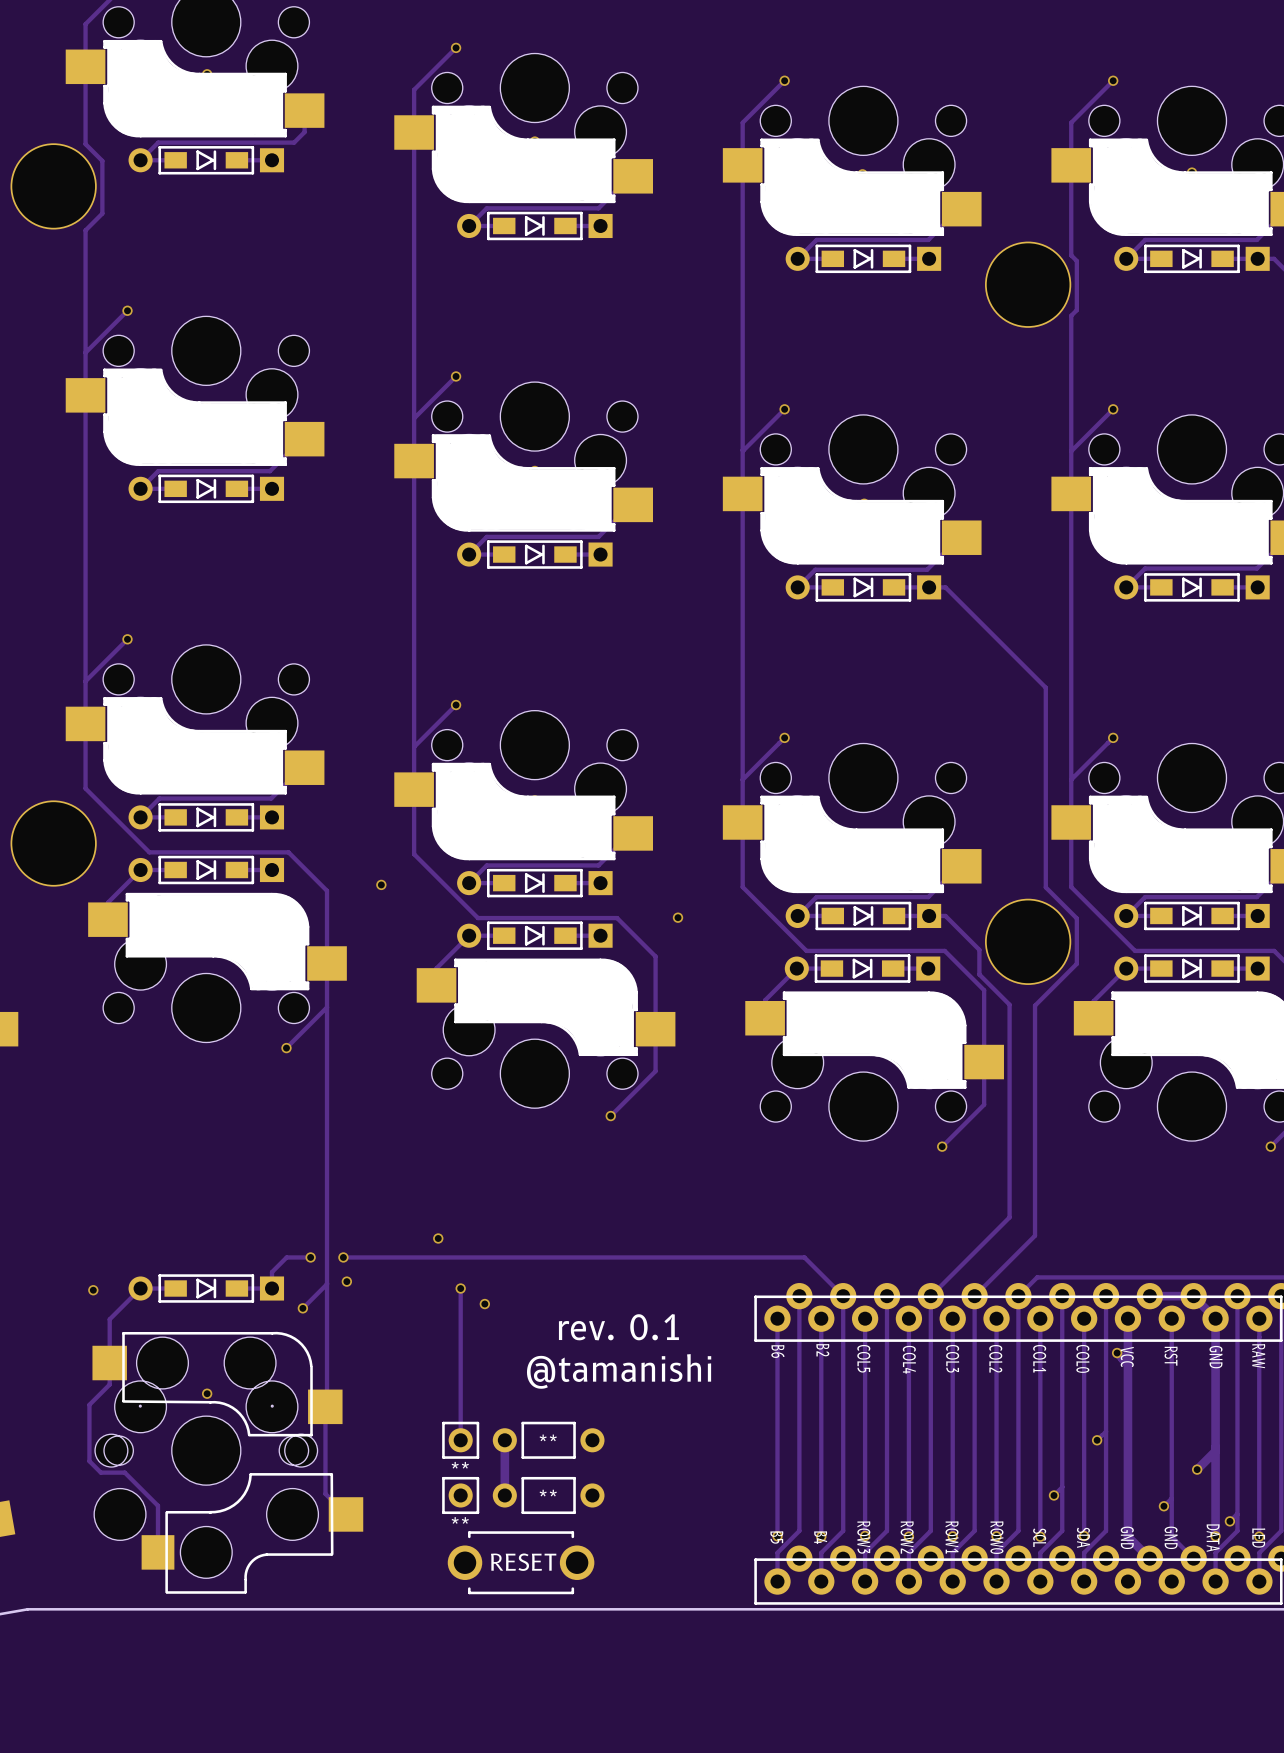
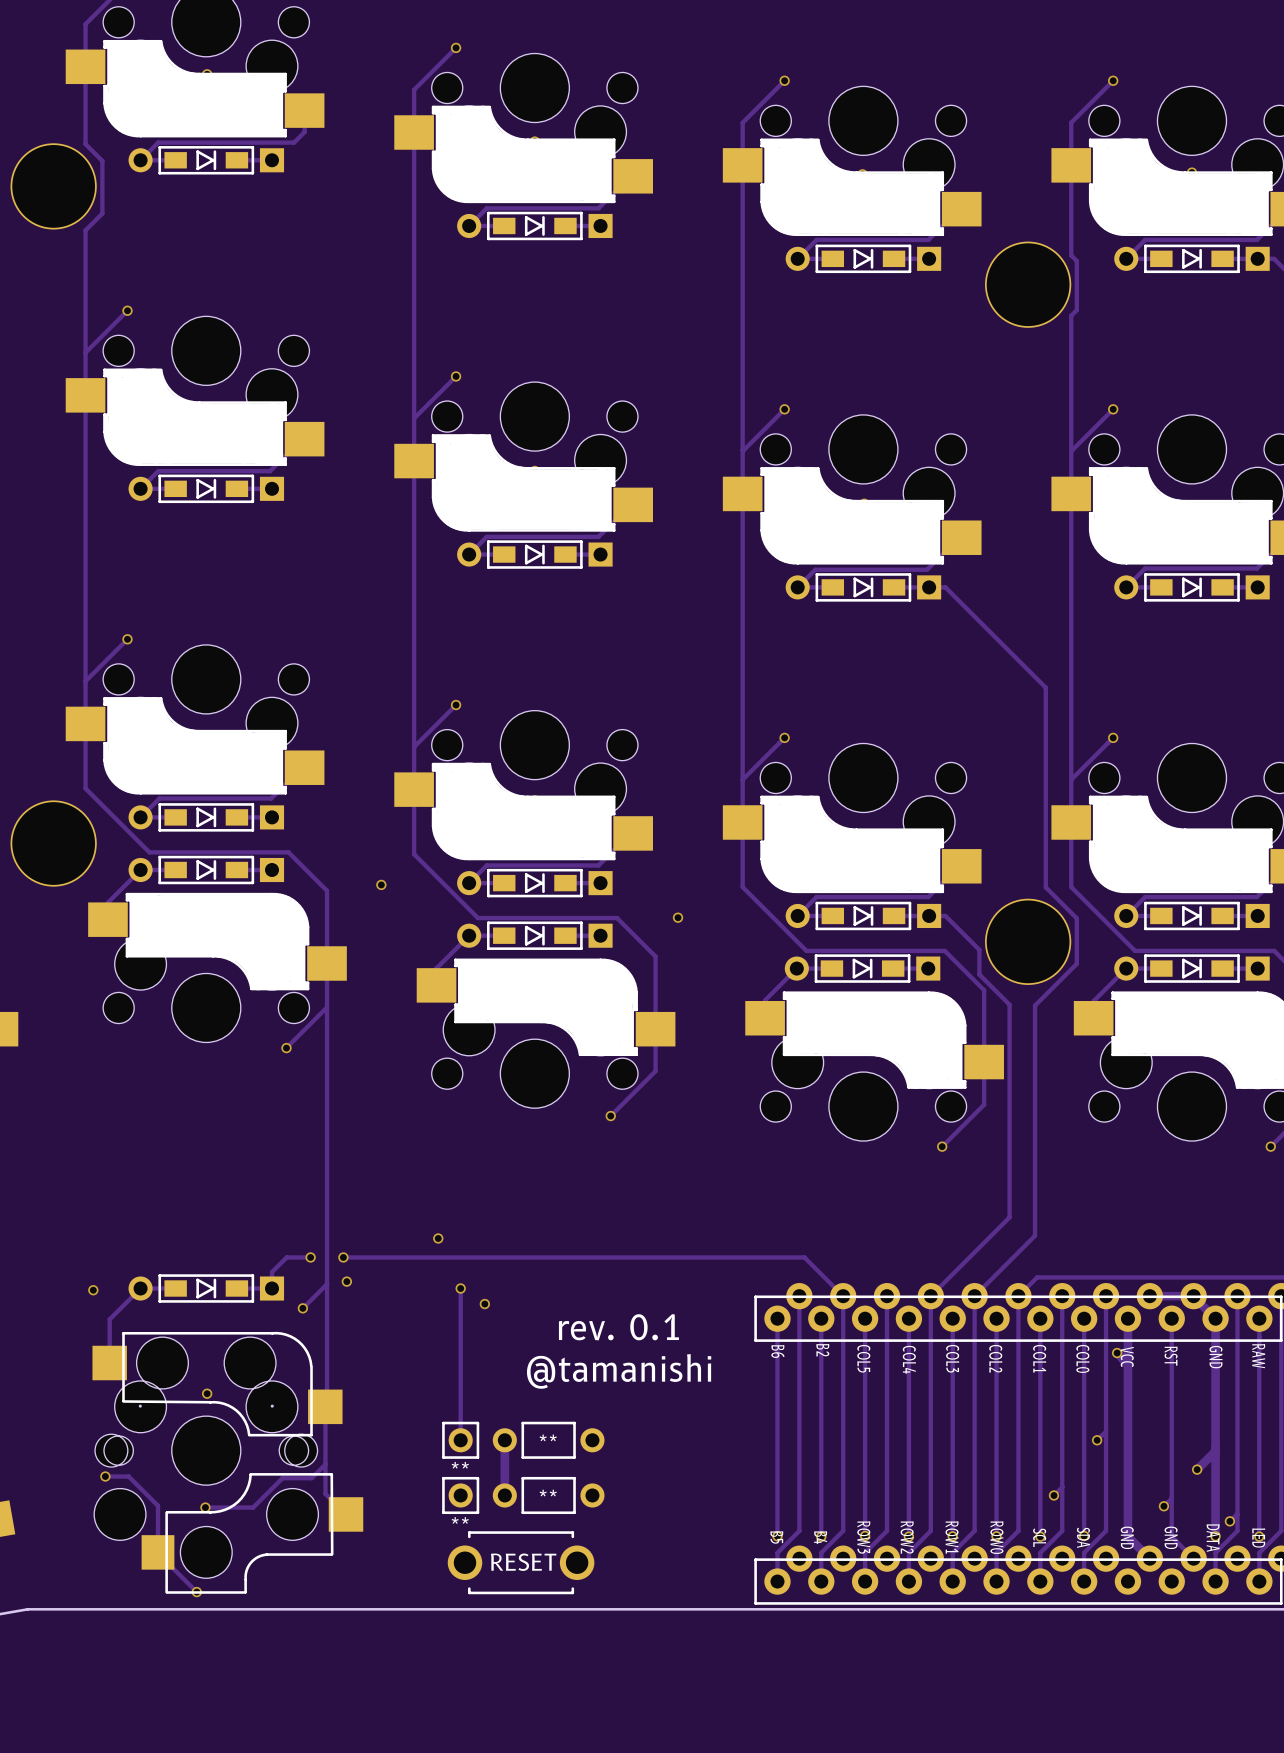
track: (109, 1363) (109, 1384) (89, 1404) (89, 1461) (100, 1472) (124, 1472) (128, 1476) -> (105, 1476) (128, 1476)
track: none -> (325, 1464) (311, 1478) (282, 1478) (253, 1507) (205, 1507)
via: none -> (105, 1476)
via: none -> (205, 1507)
track: none -> (158, 1552) (196, 1592)
via: none -> (196, 1592)

